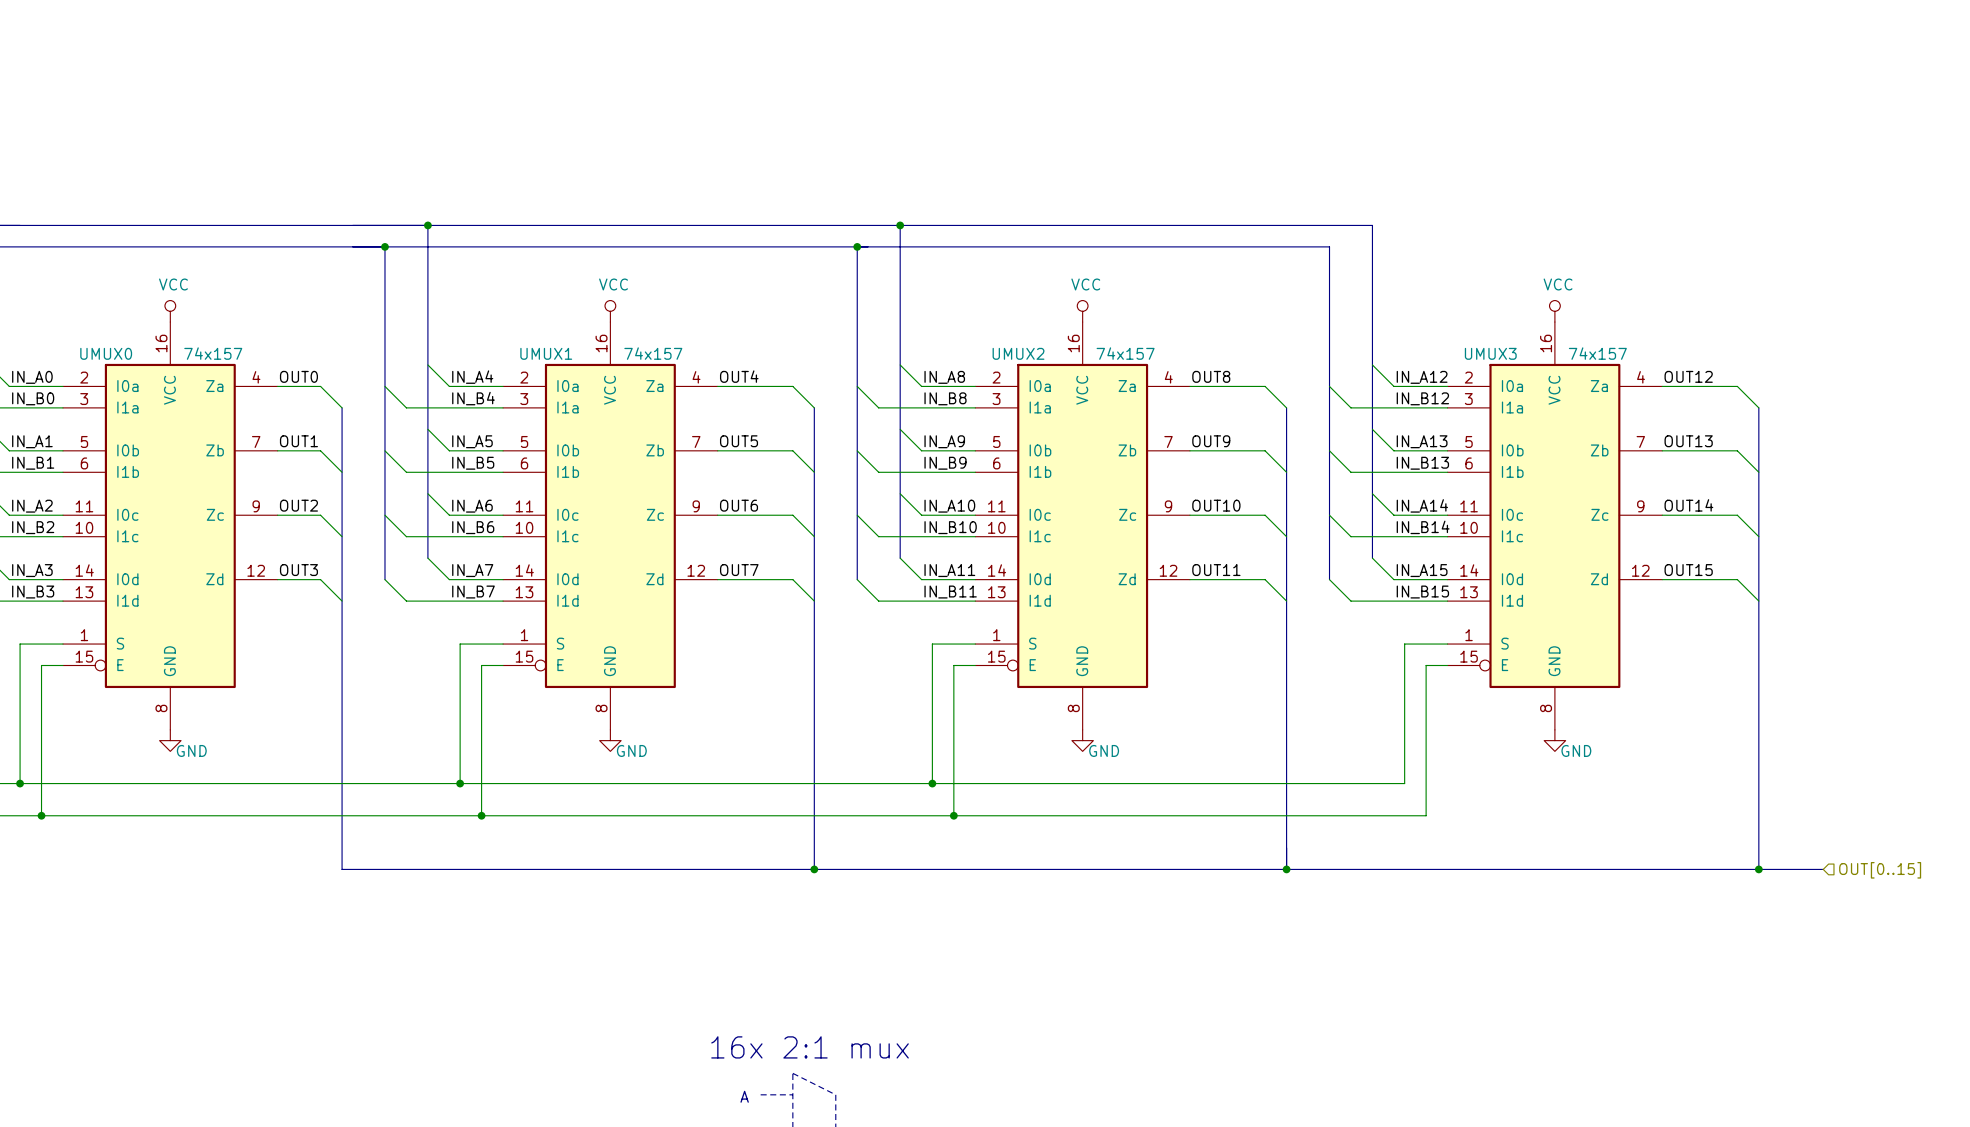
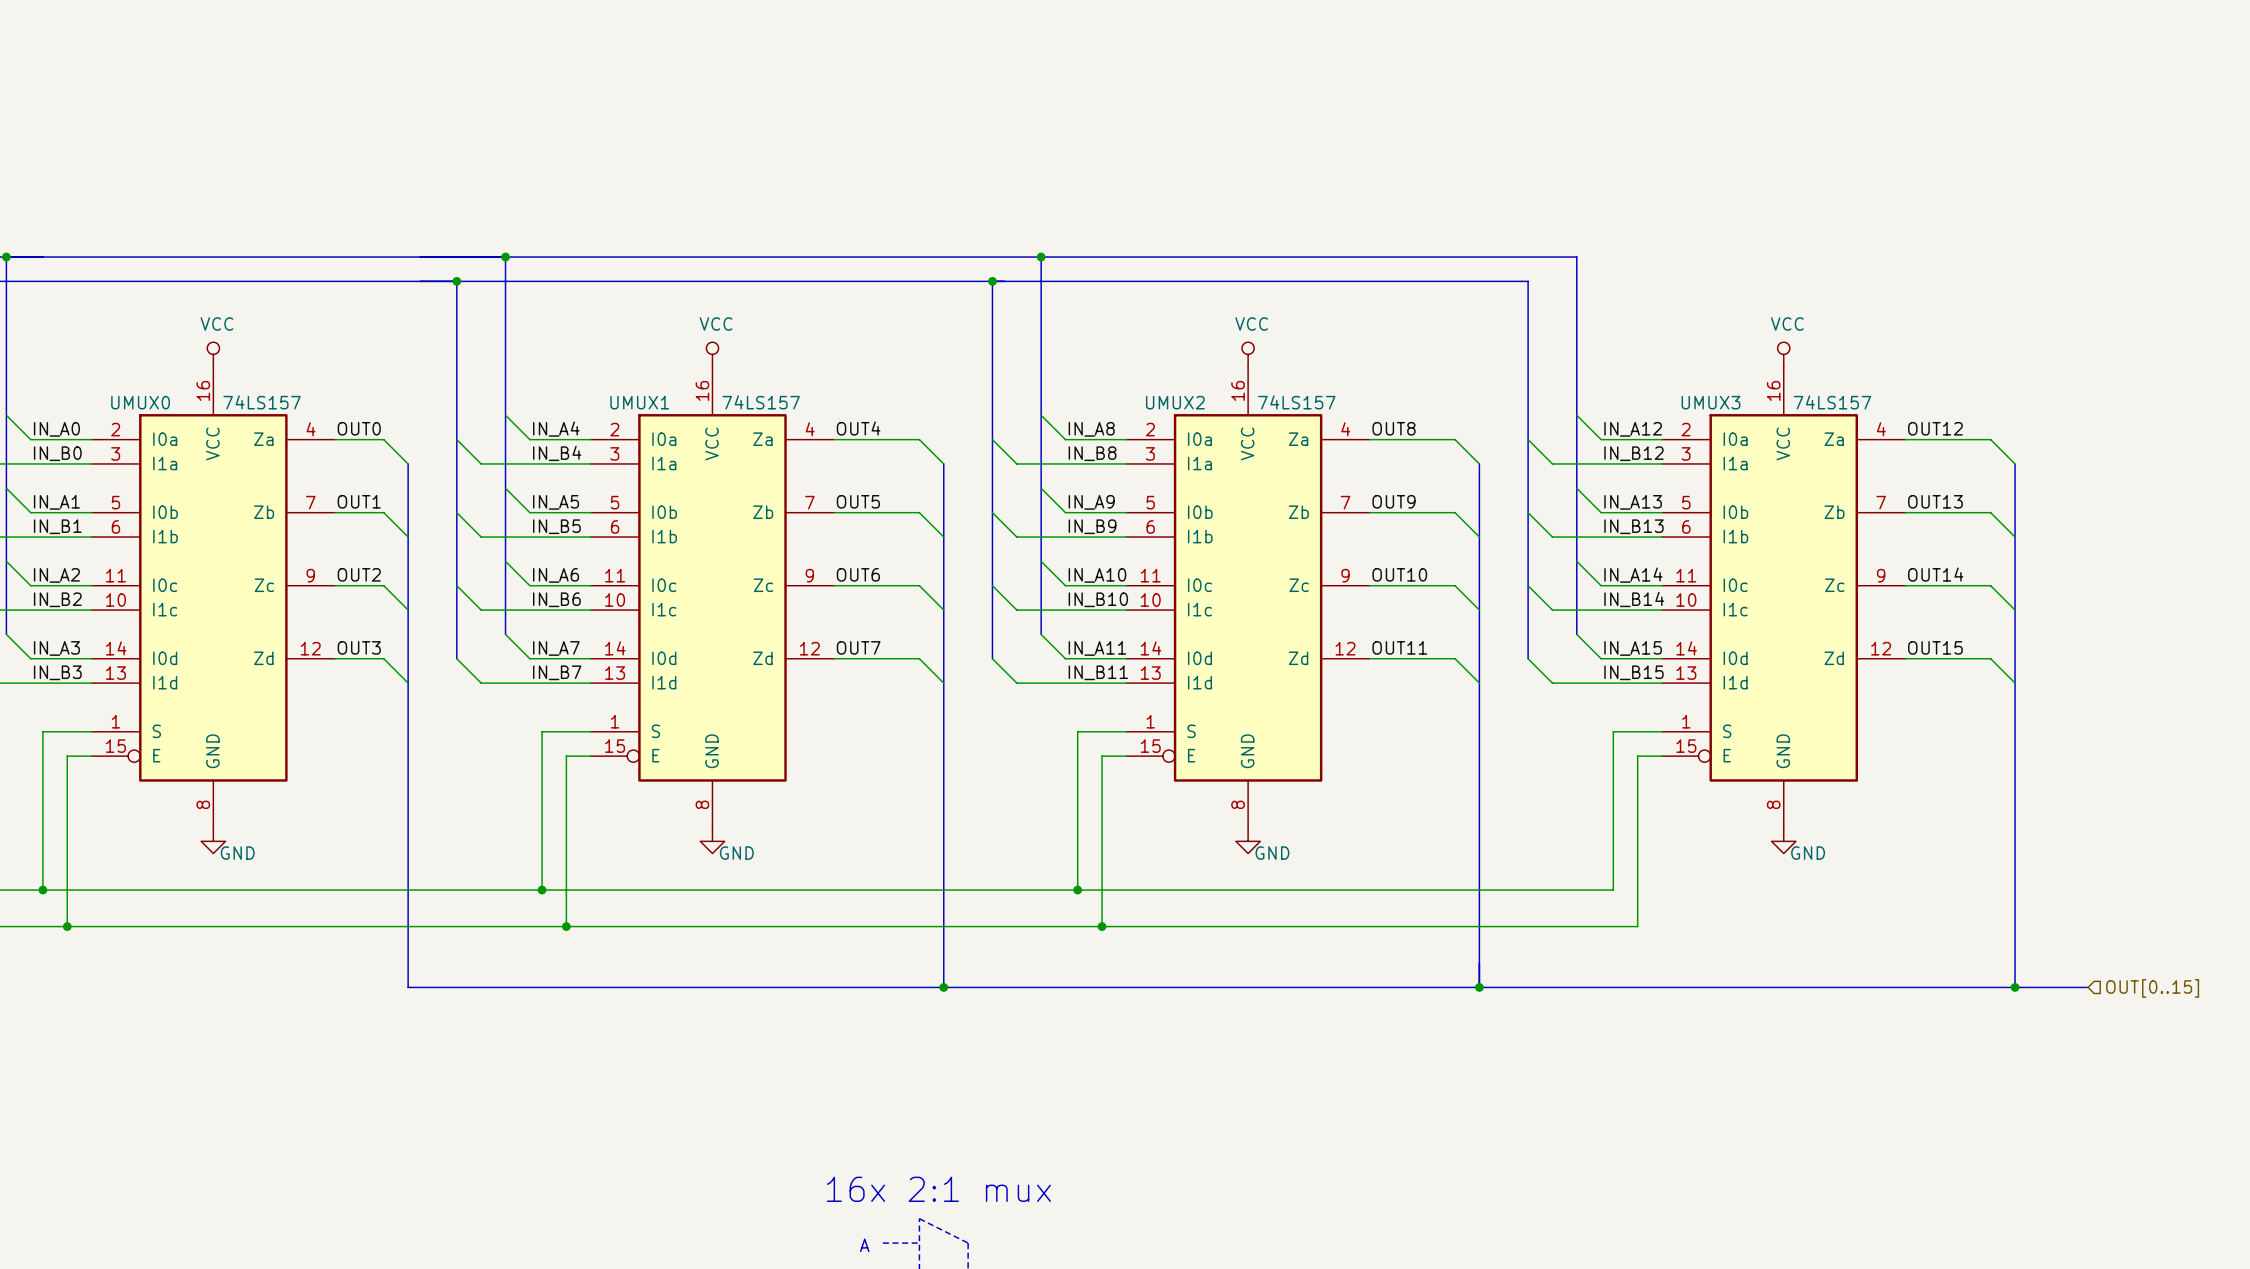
UMUX0 value: 74x157 (213, 353) -> 74LS157 (262, 402)
UMUX1 value: 74x157 (653, 353) -> 74LS157 (761, 402)
UMUX2 value: 74x157 (1125, 353) -> 74LS157 (1296, 402)
UMUX3 value: 74x157 (1597, 353) -> 74LS157 (1832, 402)

